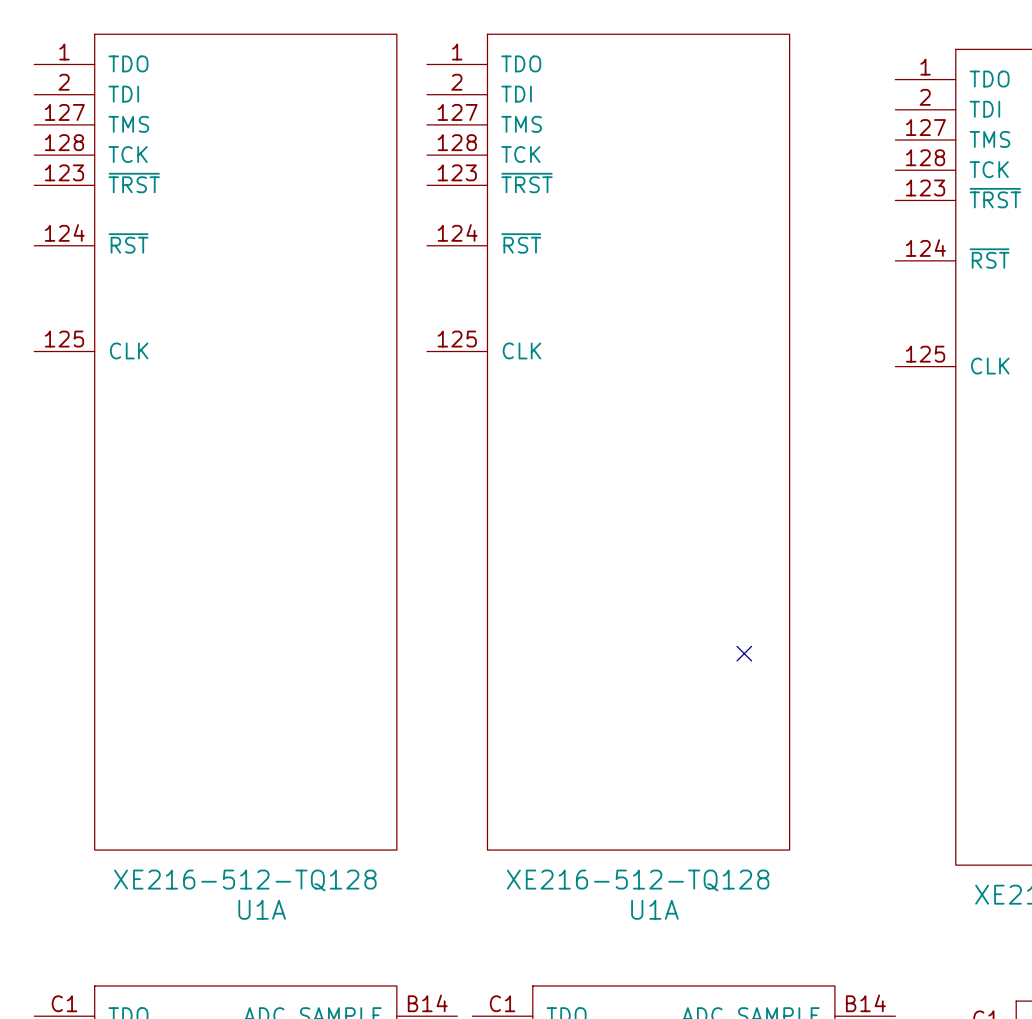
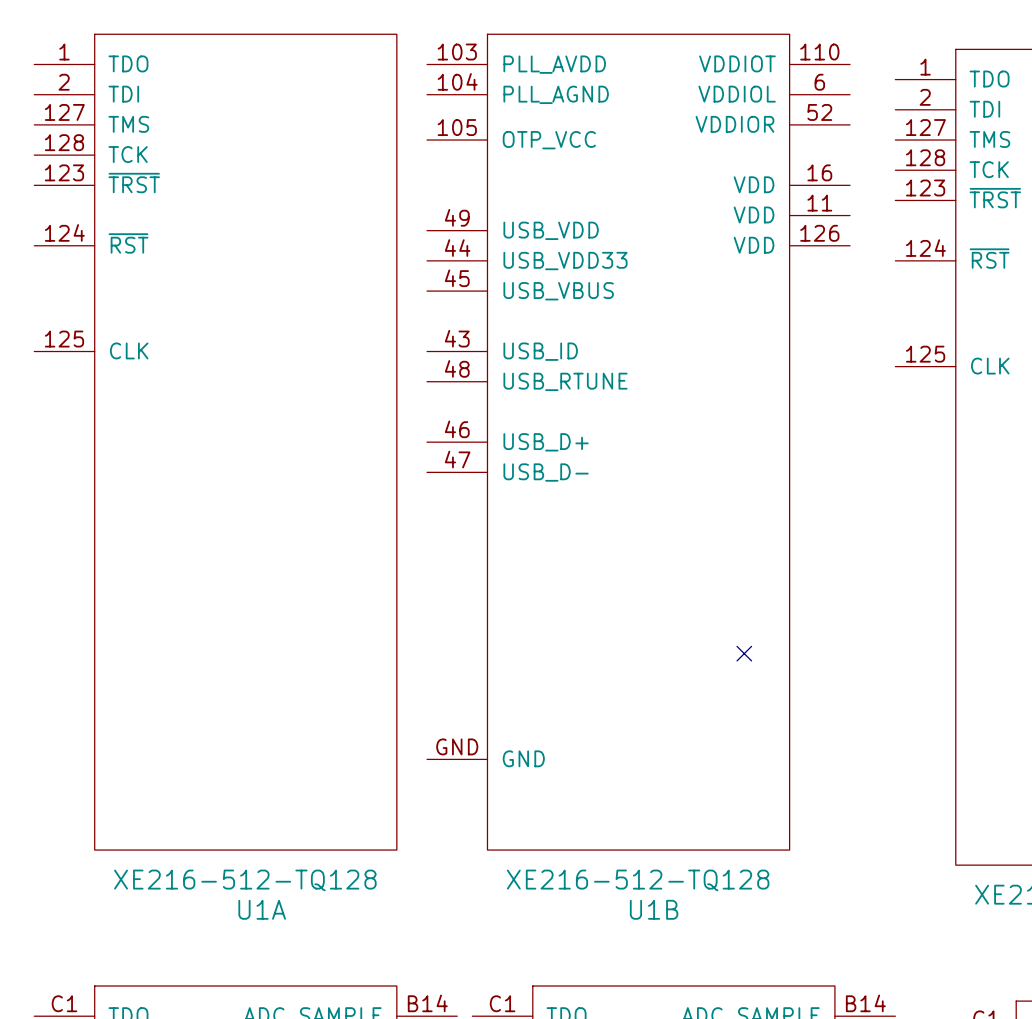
U1A: XE216-512-TQ128 (608, 442) -> none
U1B: none -> XE216-512-TQ128 (638, 442)

